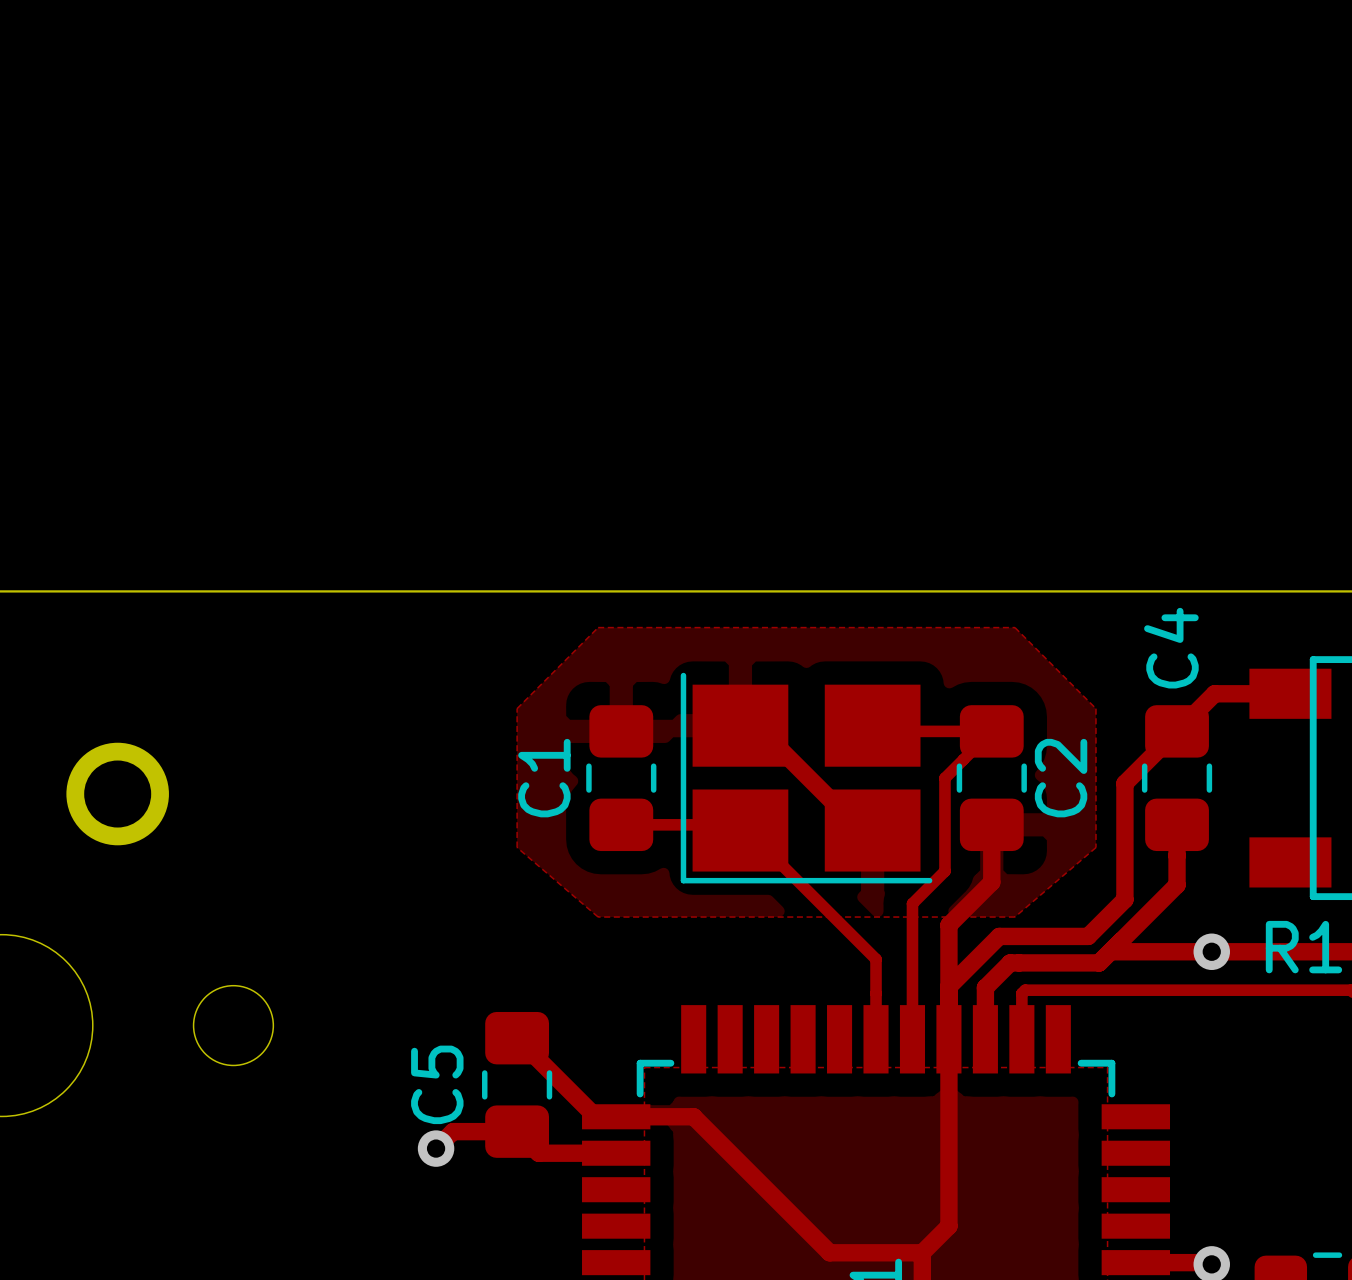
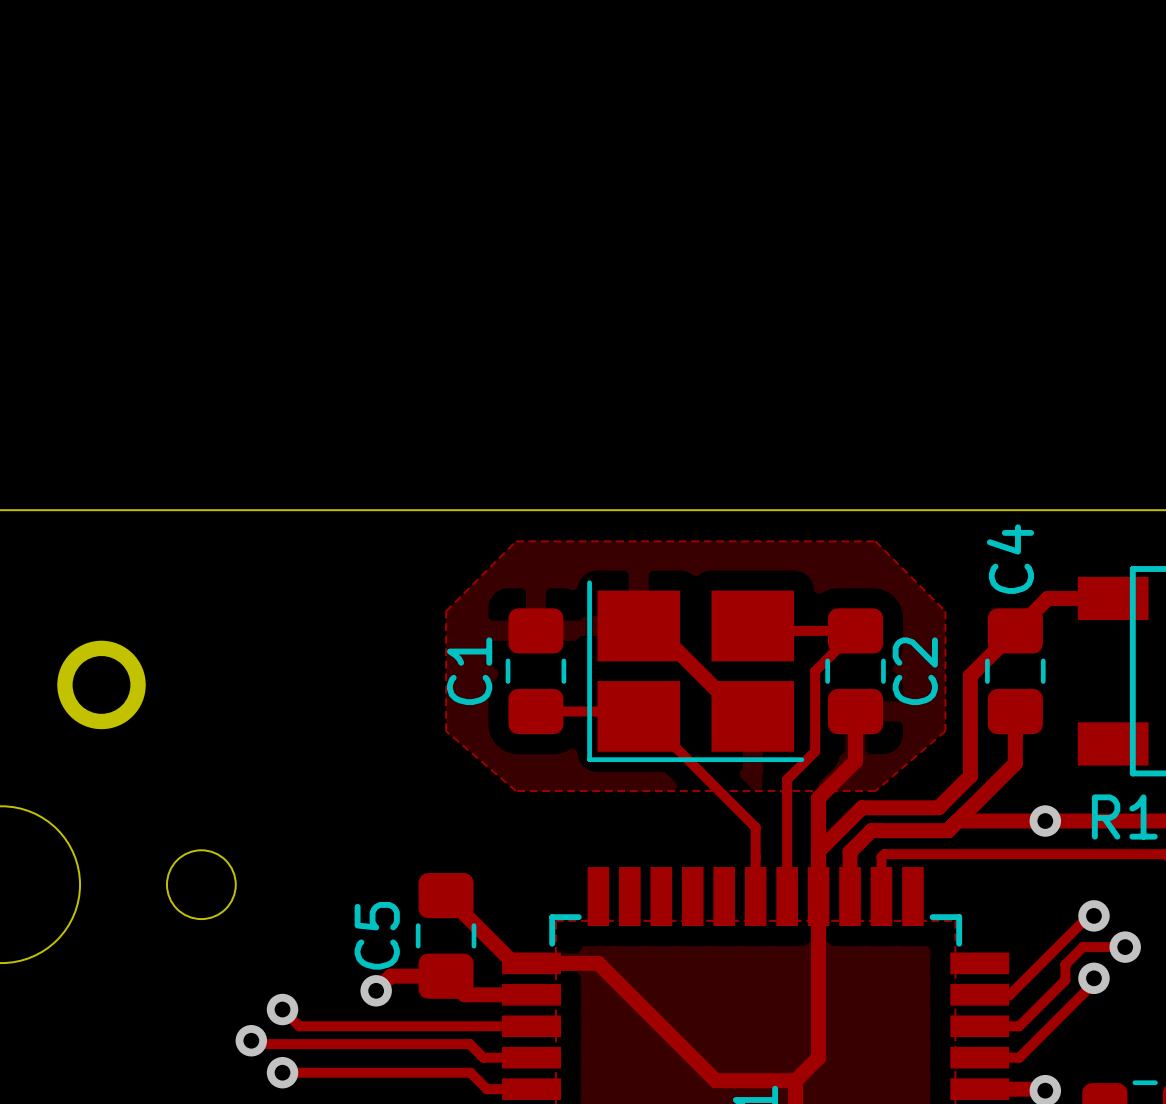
track: none -> (1093, 915) (1088, 915) (1009, 994) (979, 994)
via: none -> (1093, 915)
track: none -> (1125, 947) (1082, 947) (1065, 964) (1065, 980) (1019, 1026) (979, 1026)
via: none -> (1125, 947)
track: none -> (1093, 978) (1093, 983) (1019, 1057) (979, 1057)
via: none -> (1093, 978)
track: none -> (282, 1009) (299, 1026) (531, 1026)
via: none -> (282, 1009)
track: none -> (251, 1040) (254, 1044) (469, 1044) (483, 1057) (531, 1057)
via: none -> (251, 1040)
track: none -> (282, 1072) (470, 1072) (487, 1089) (531, 1089)
via: none -> (282, 1072)

